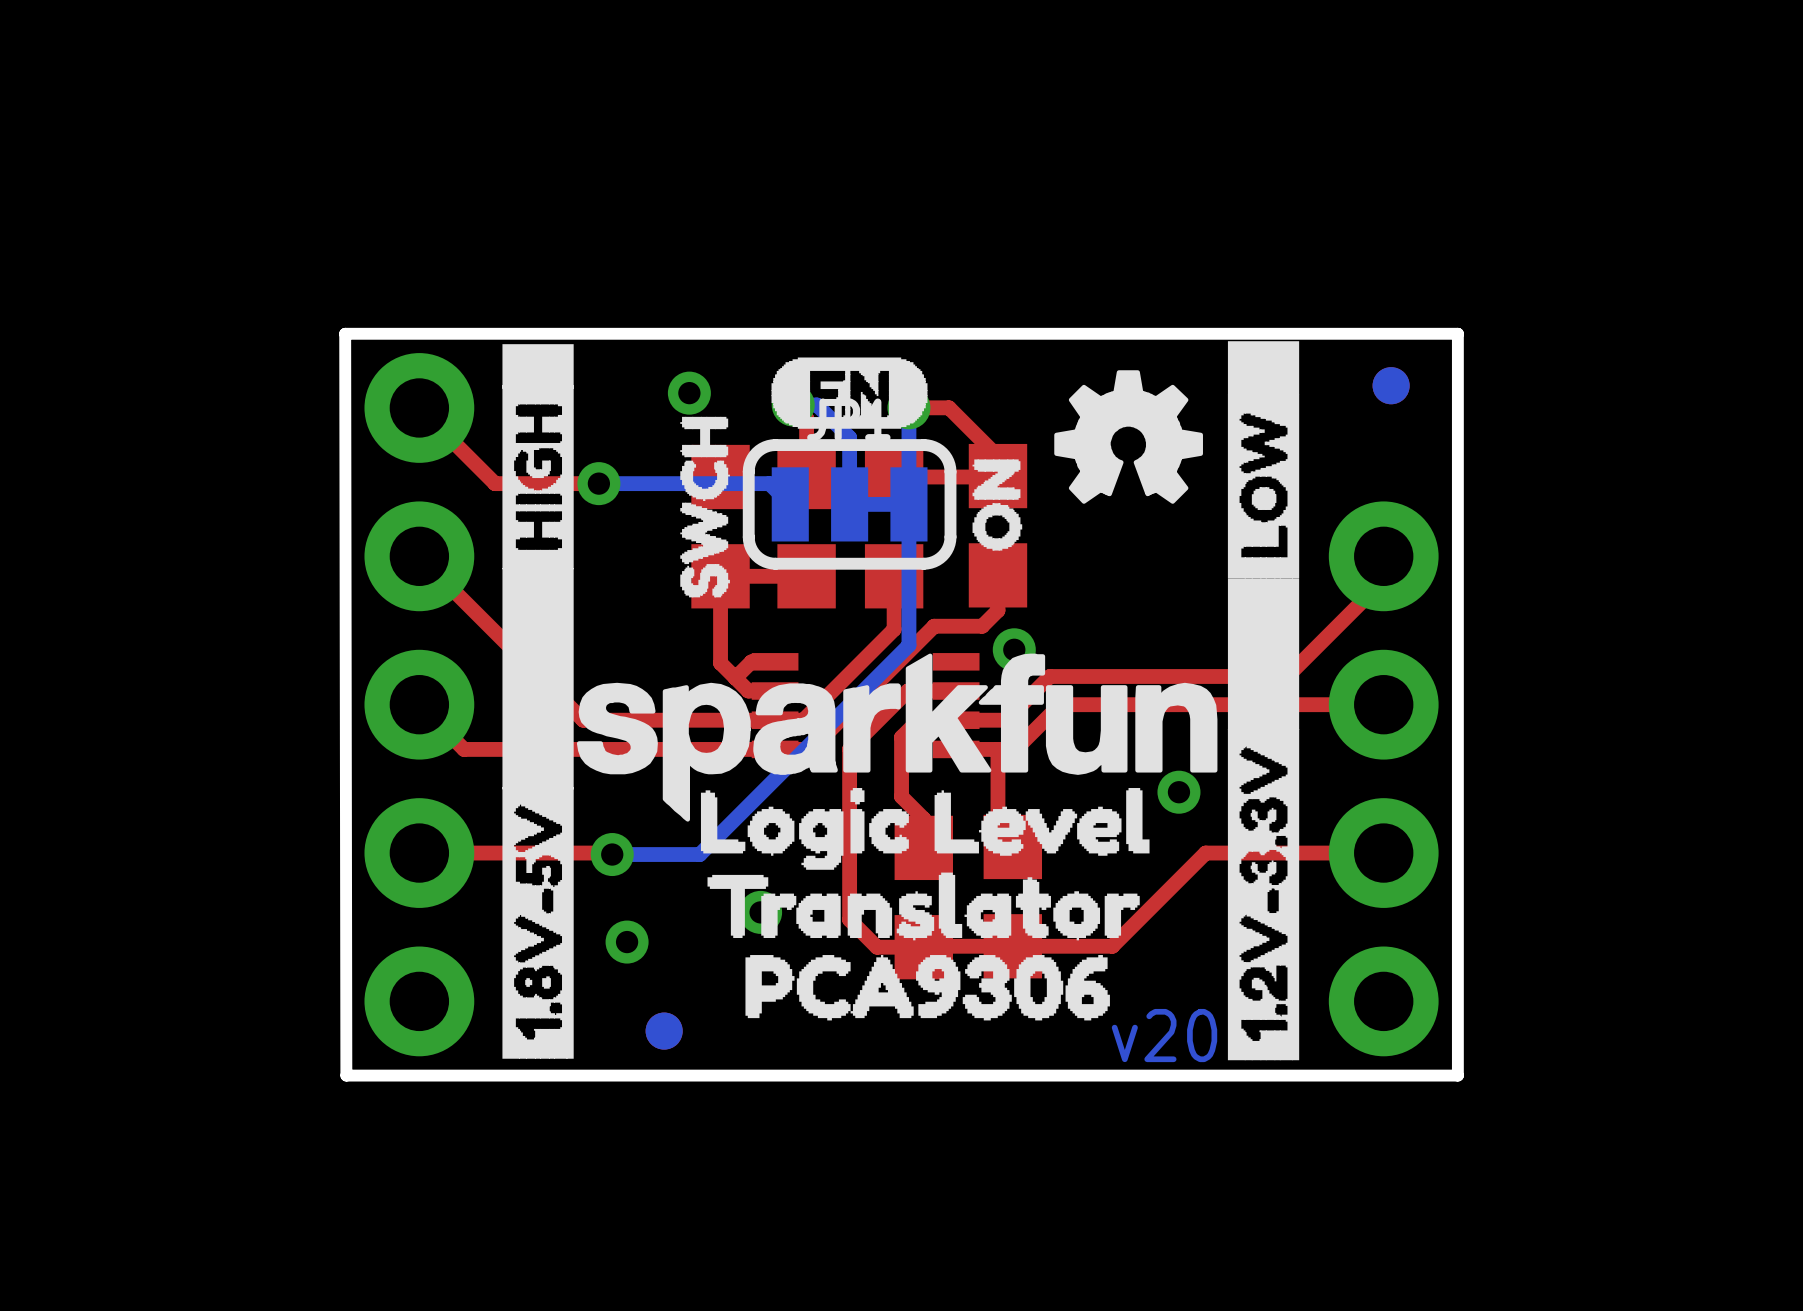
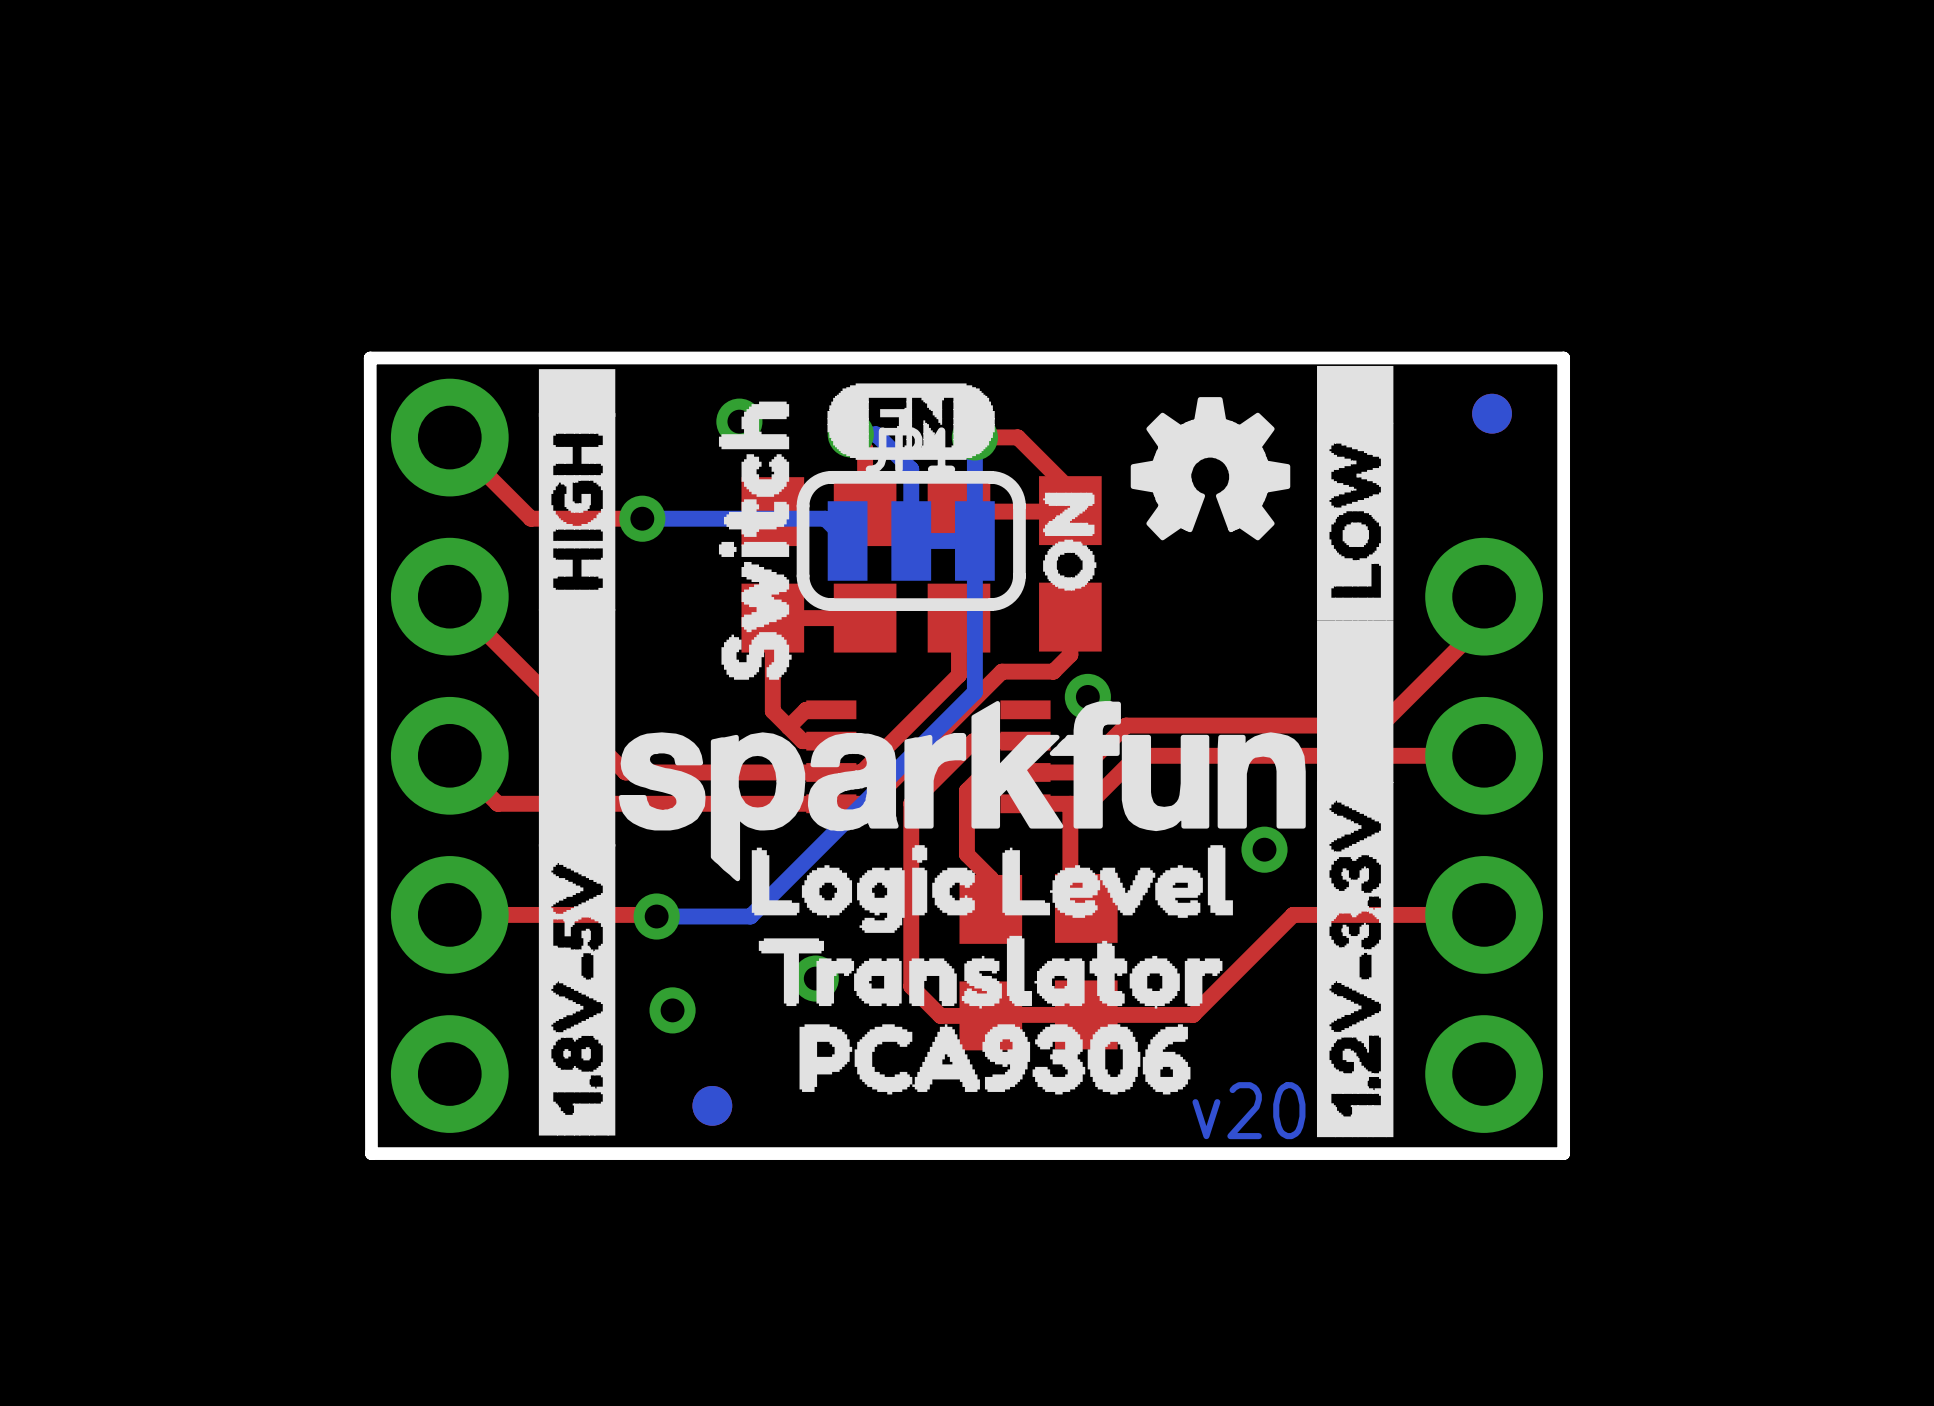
drawing shape: [680, 416, 730, 598] -> [718, 401, 792, 680]

